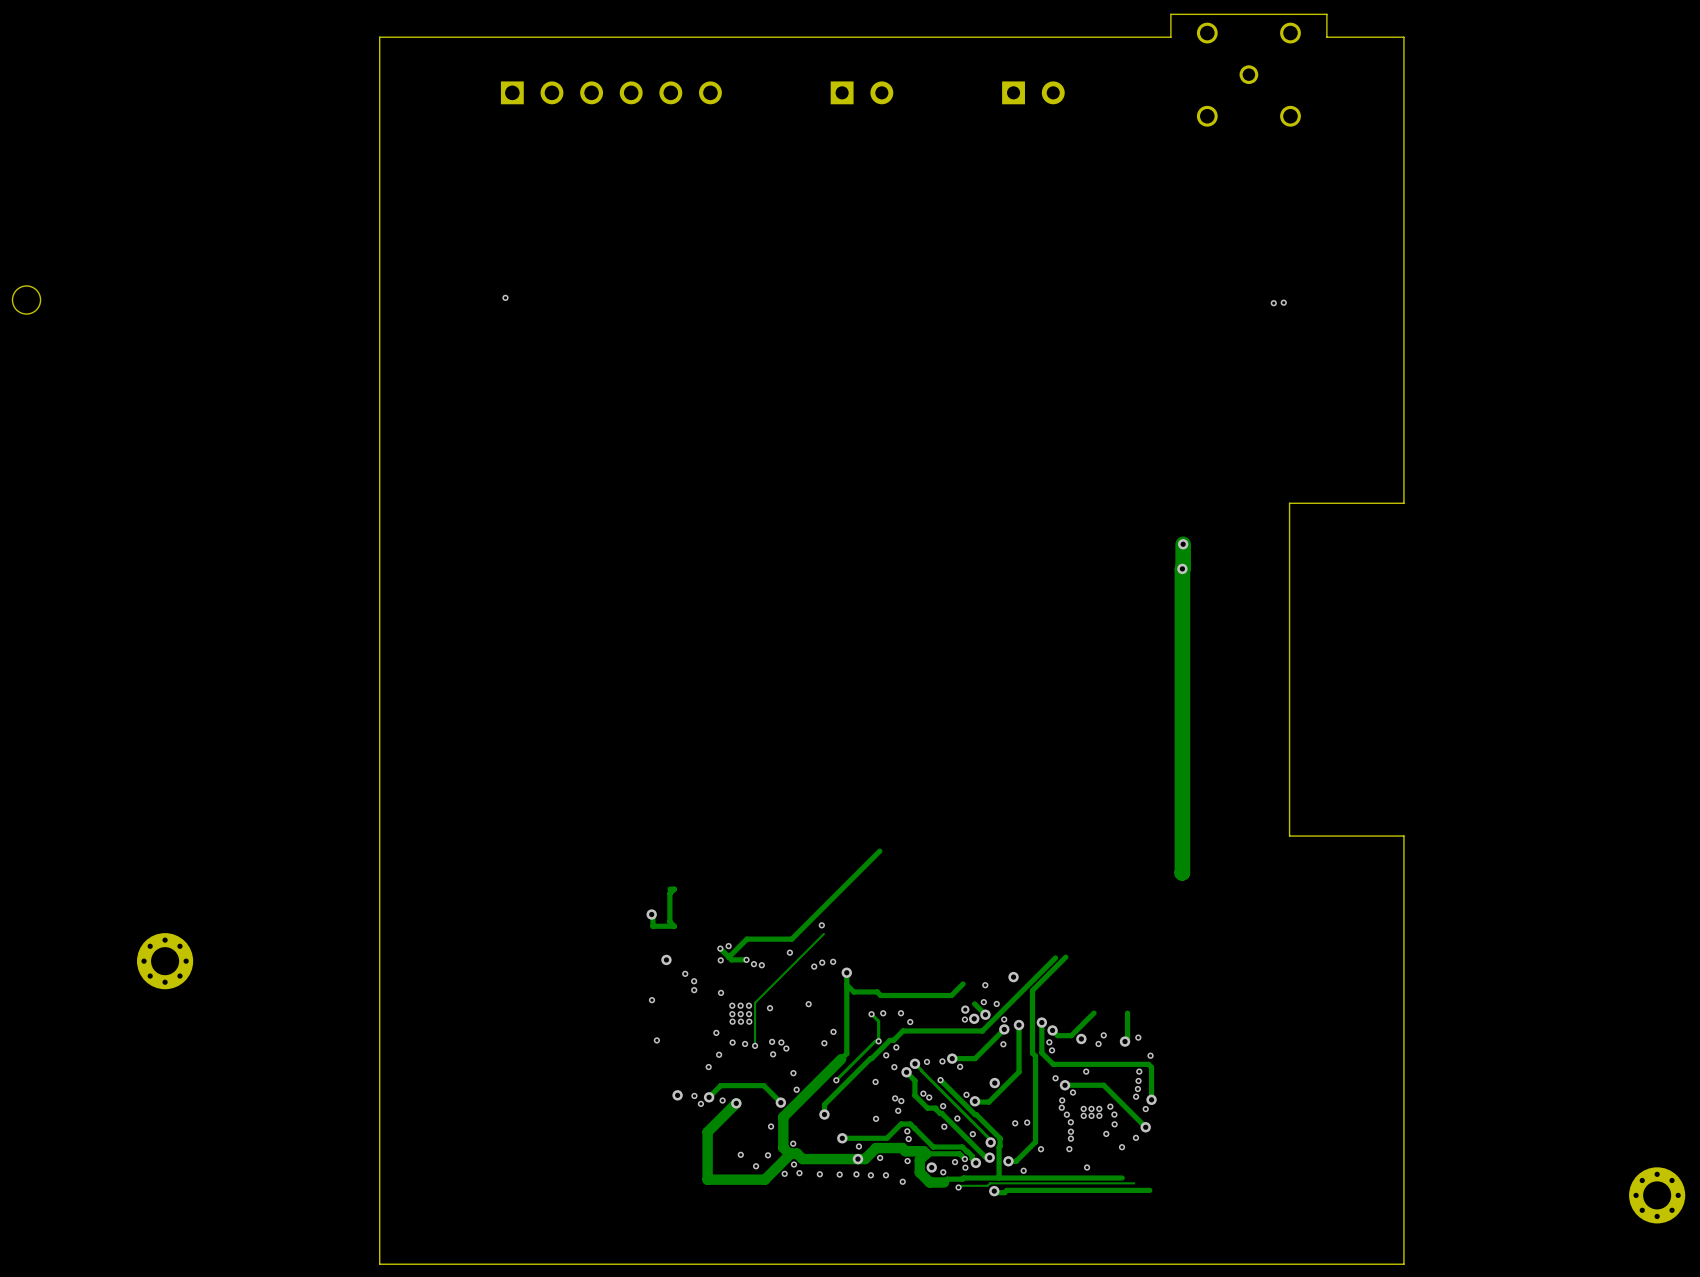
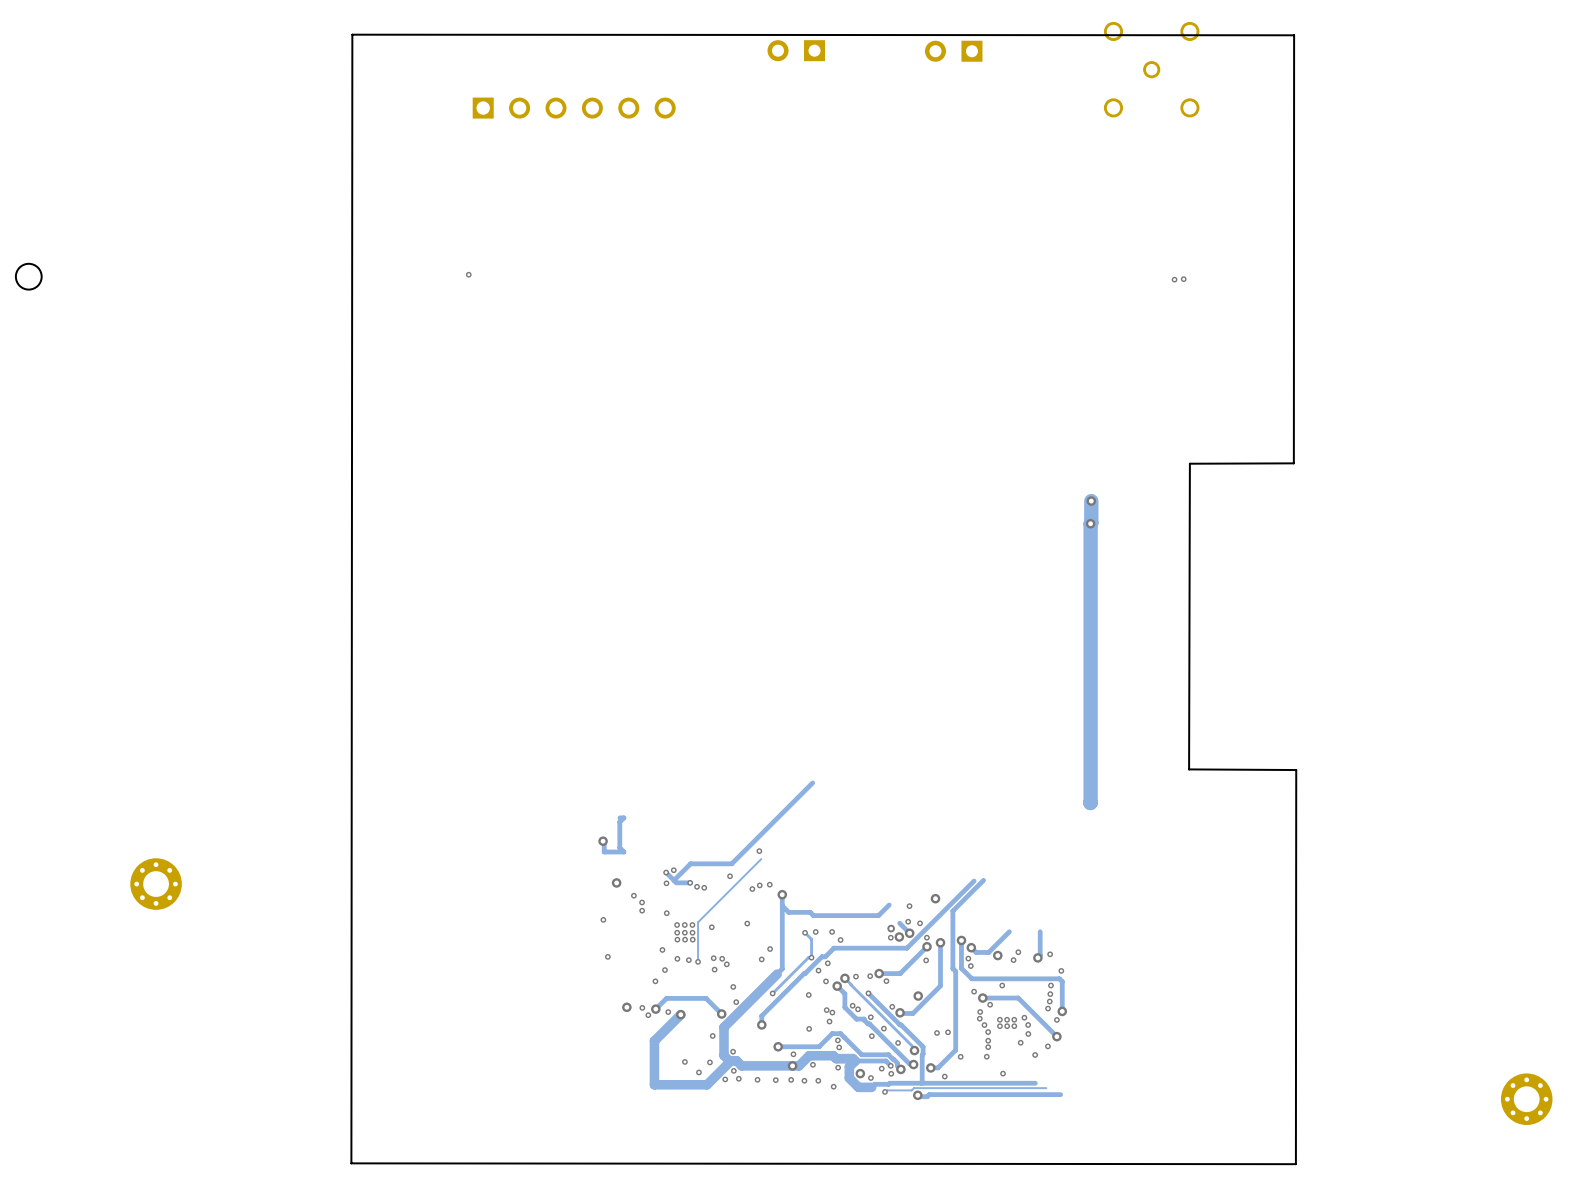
board edge: (1326, 14) (1326, 37) (1403, 37) (1403, 503) (1289, 503) (1289, 836) (1403, 836) (1403, 1264) (379, 1264) (379, 37) (1170, 37) (1170, 14) (1326, 14) -> (352, 34) (1294, 35) (1293, 463) (1189, 463) (1189, 769) (1296, 770) (1295, 1164) (351, 1163) (352, 34)
part position: (611, 92) -> (574, 108)
part rotation: 0° (861, 92) -> 180° (796, 50)
part position: (861, 92) -> (796, 50)
part rotation: 0° (1033, 92) -> 180° (953, 51)
part position: (1033, 92) -> (953, 51)

